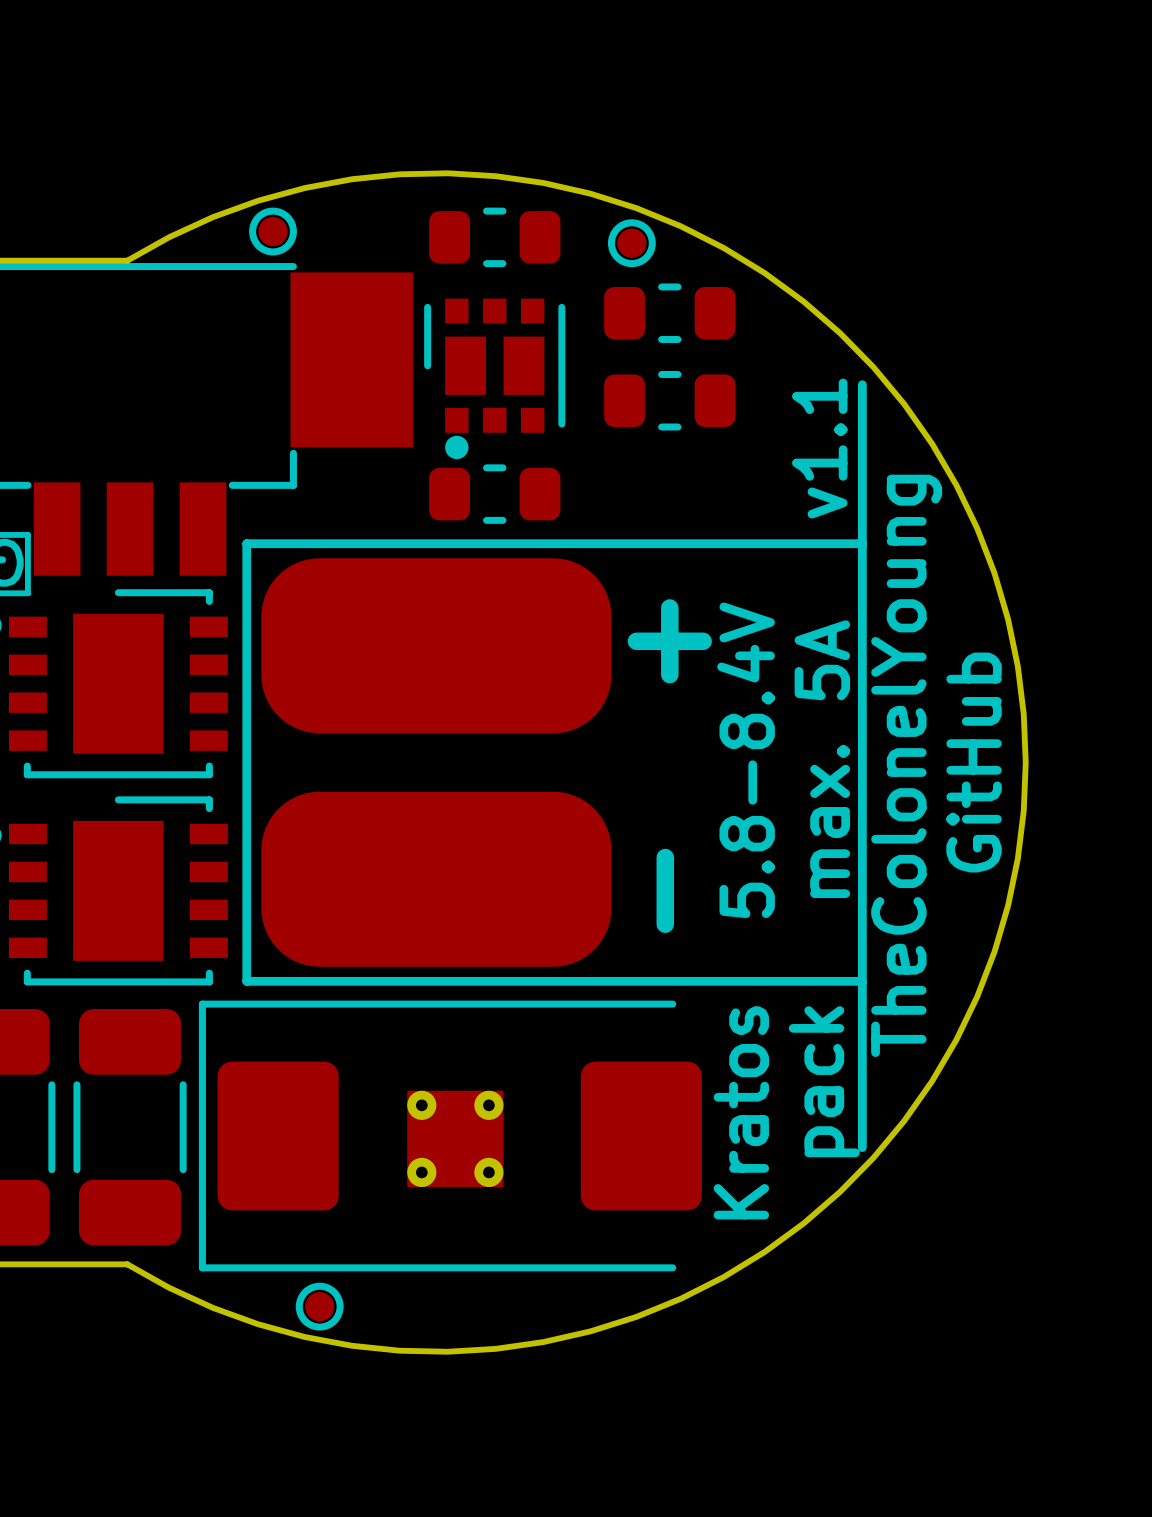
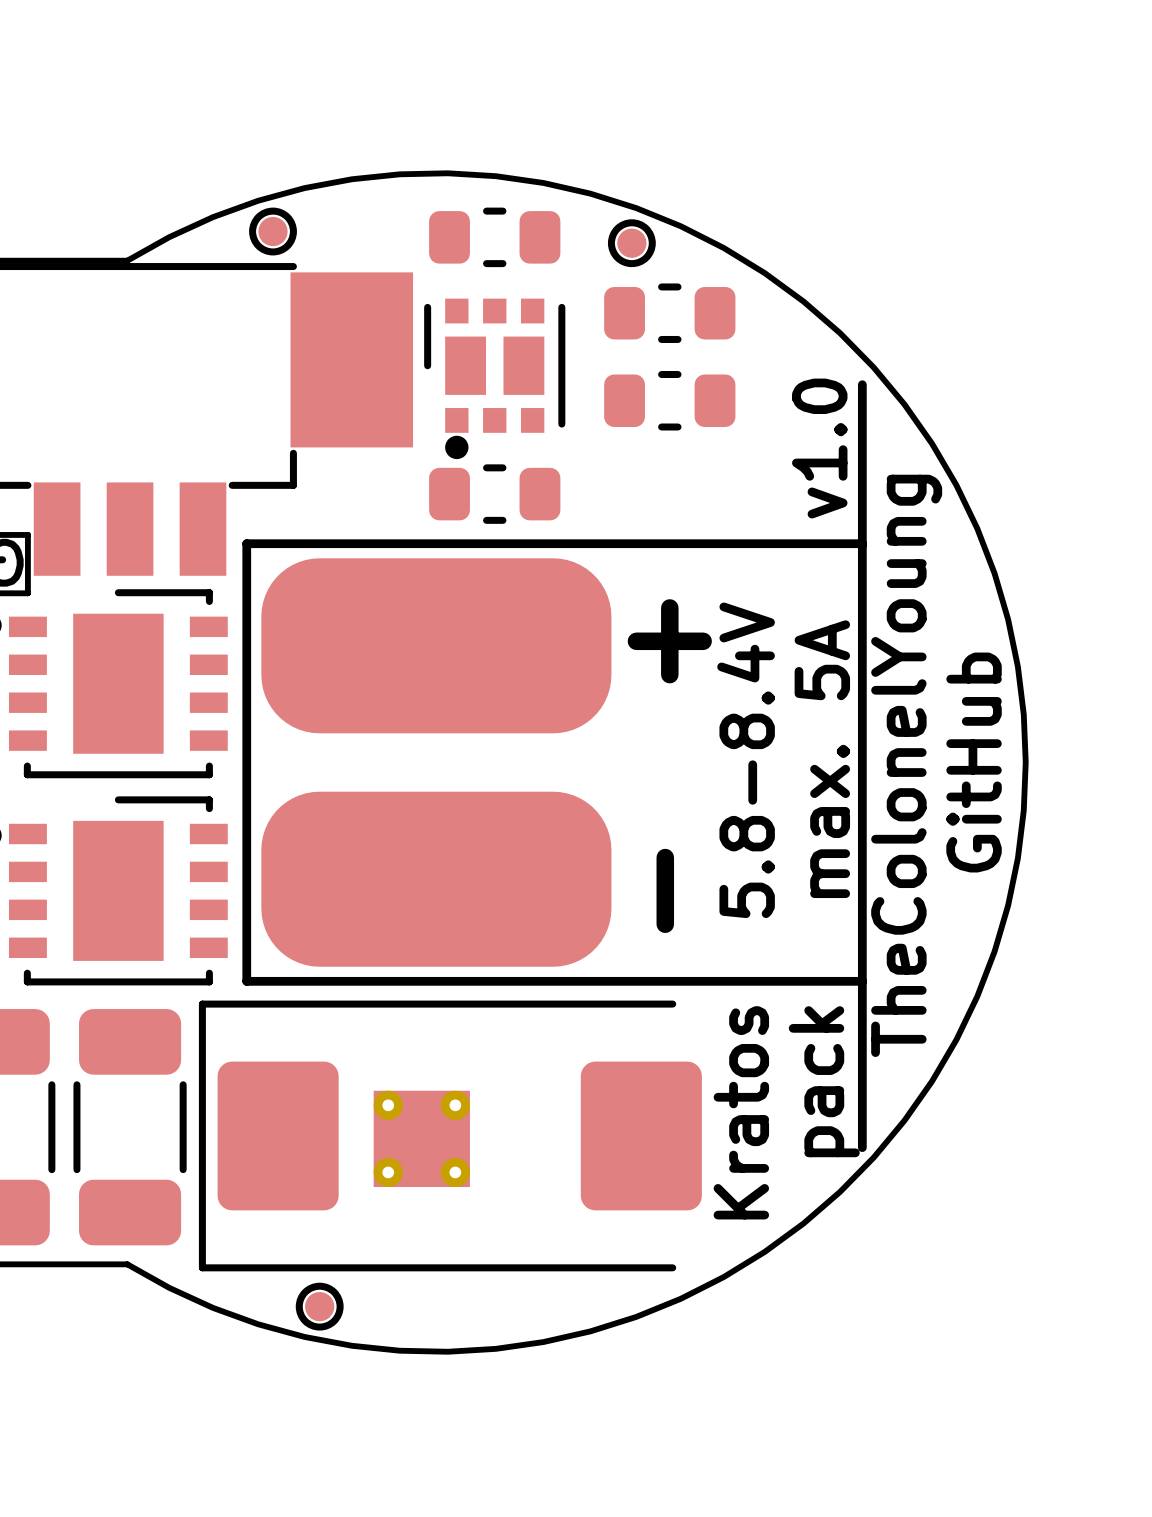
text: v1.1 (819, 448) -> v1.0 (819, 448)
part position: (455, 1138) -> (421, 1138)

